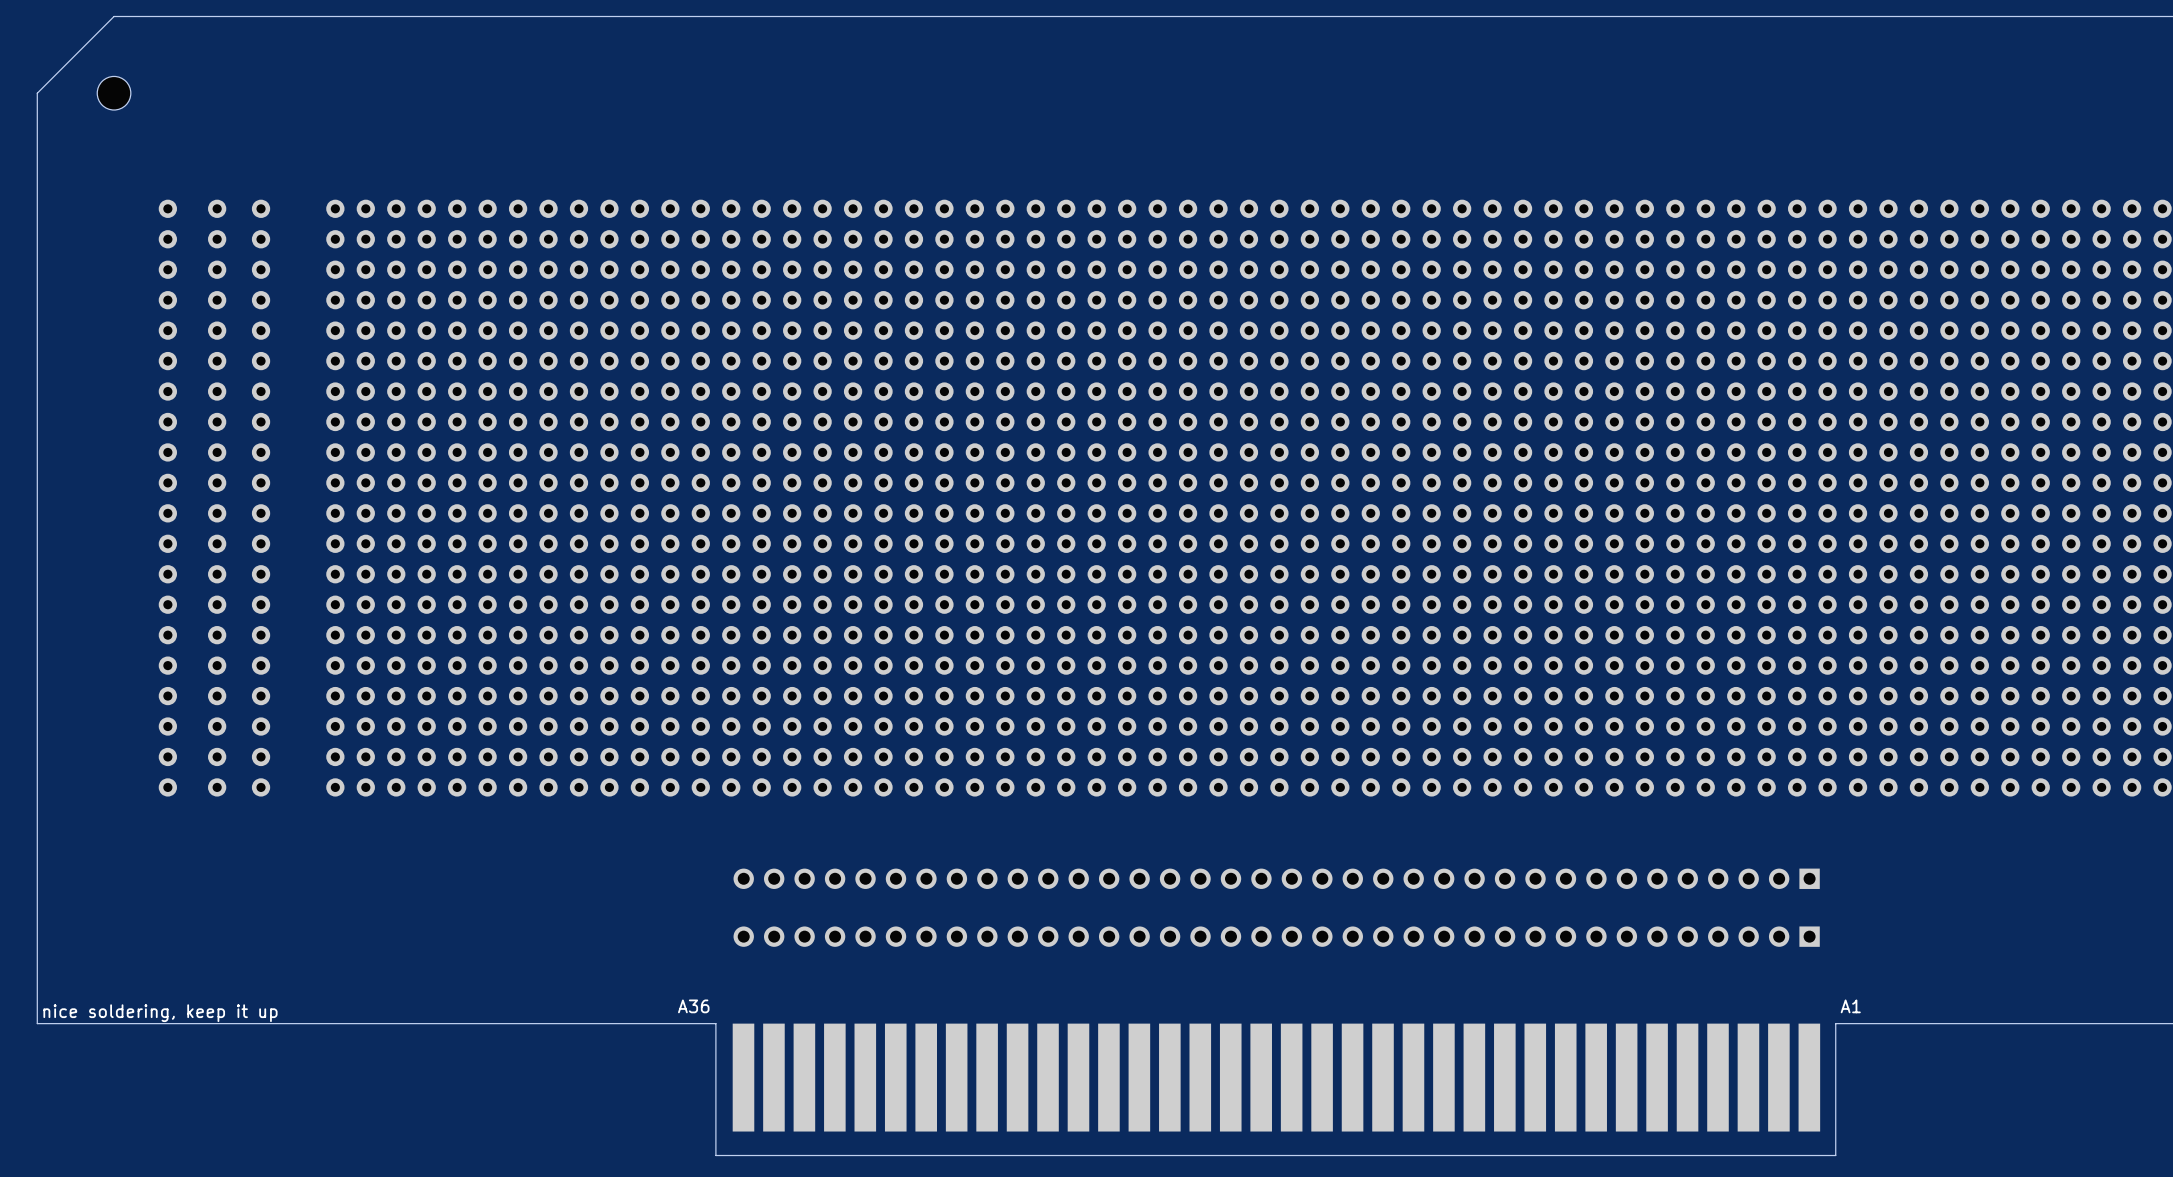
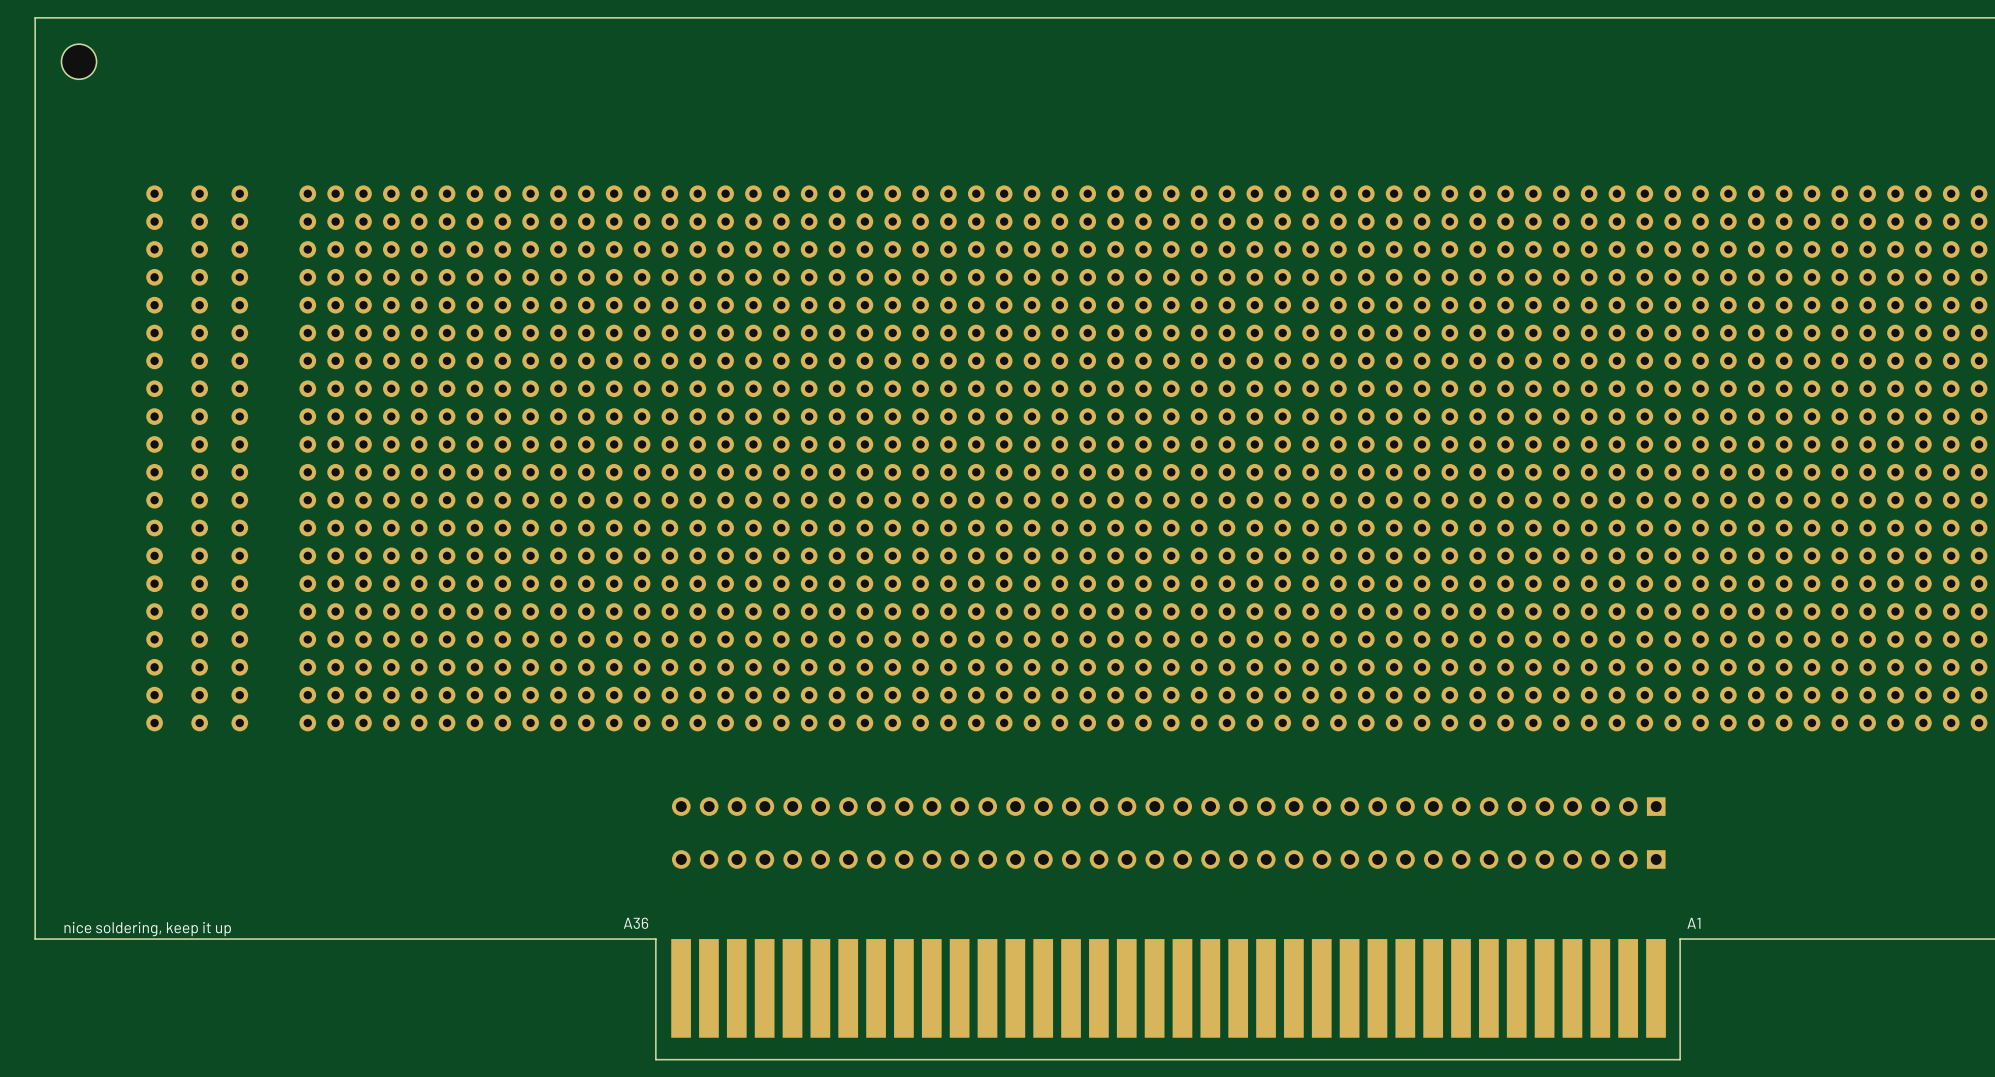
board edge: (114, 16) (37, 93) -> (105, 17) (35, 17) (35, 88)
part: none -> (79, 61)
part: (114, 93) -> none

